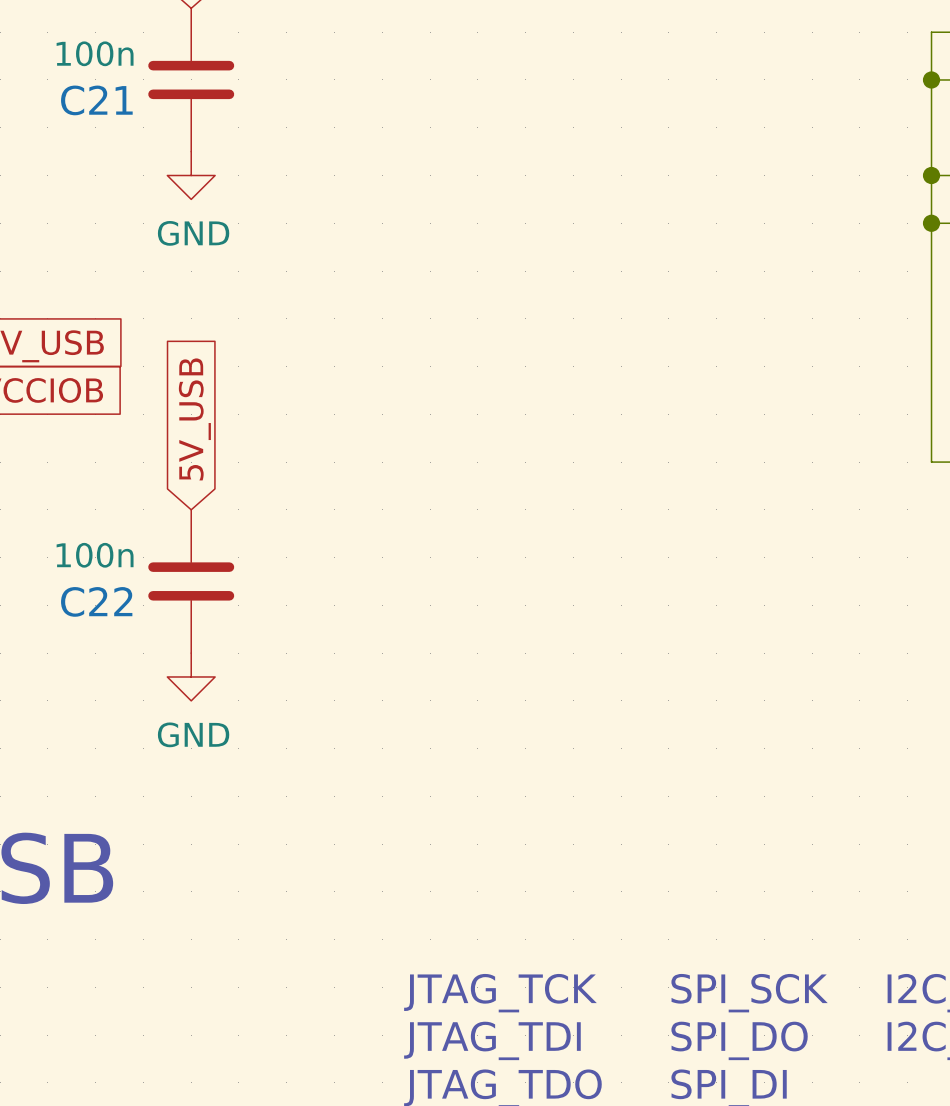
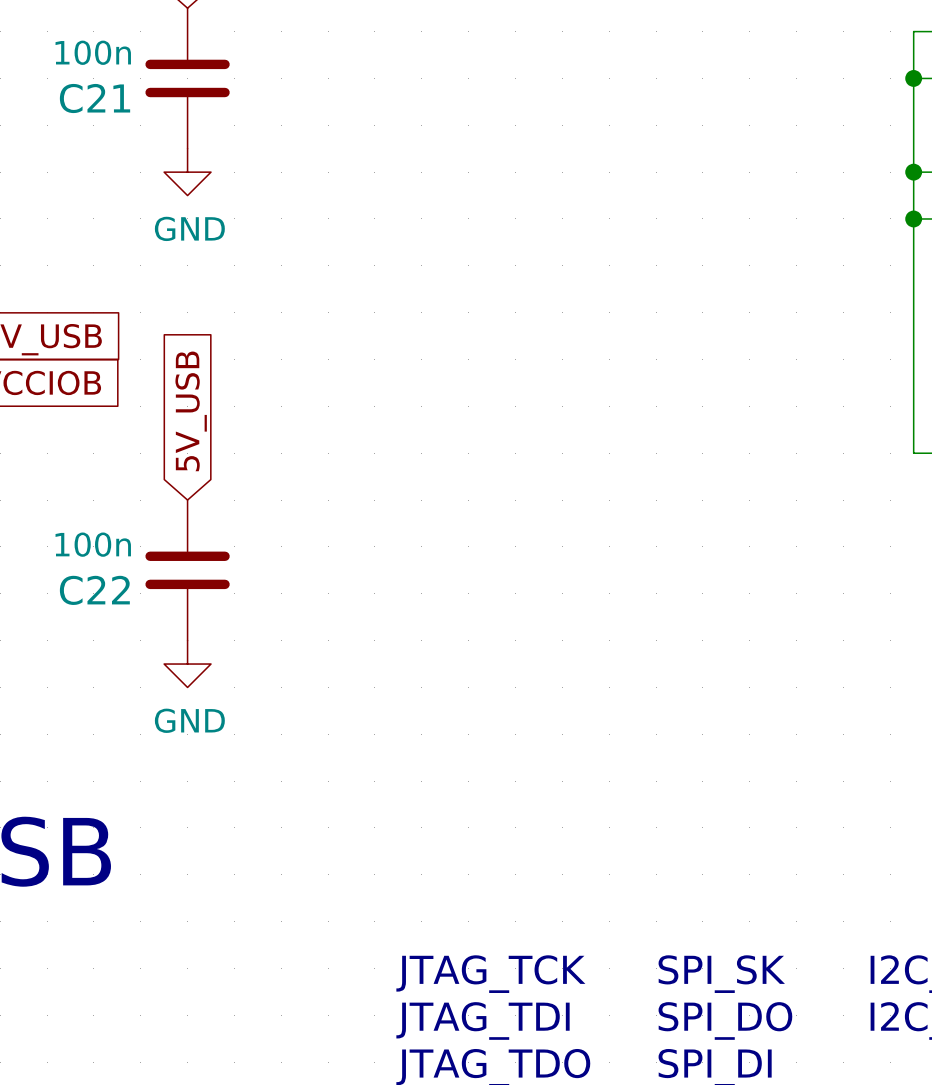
text: SPI_SCK (749, 993) -> SPI_SK (721, 974)

